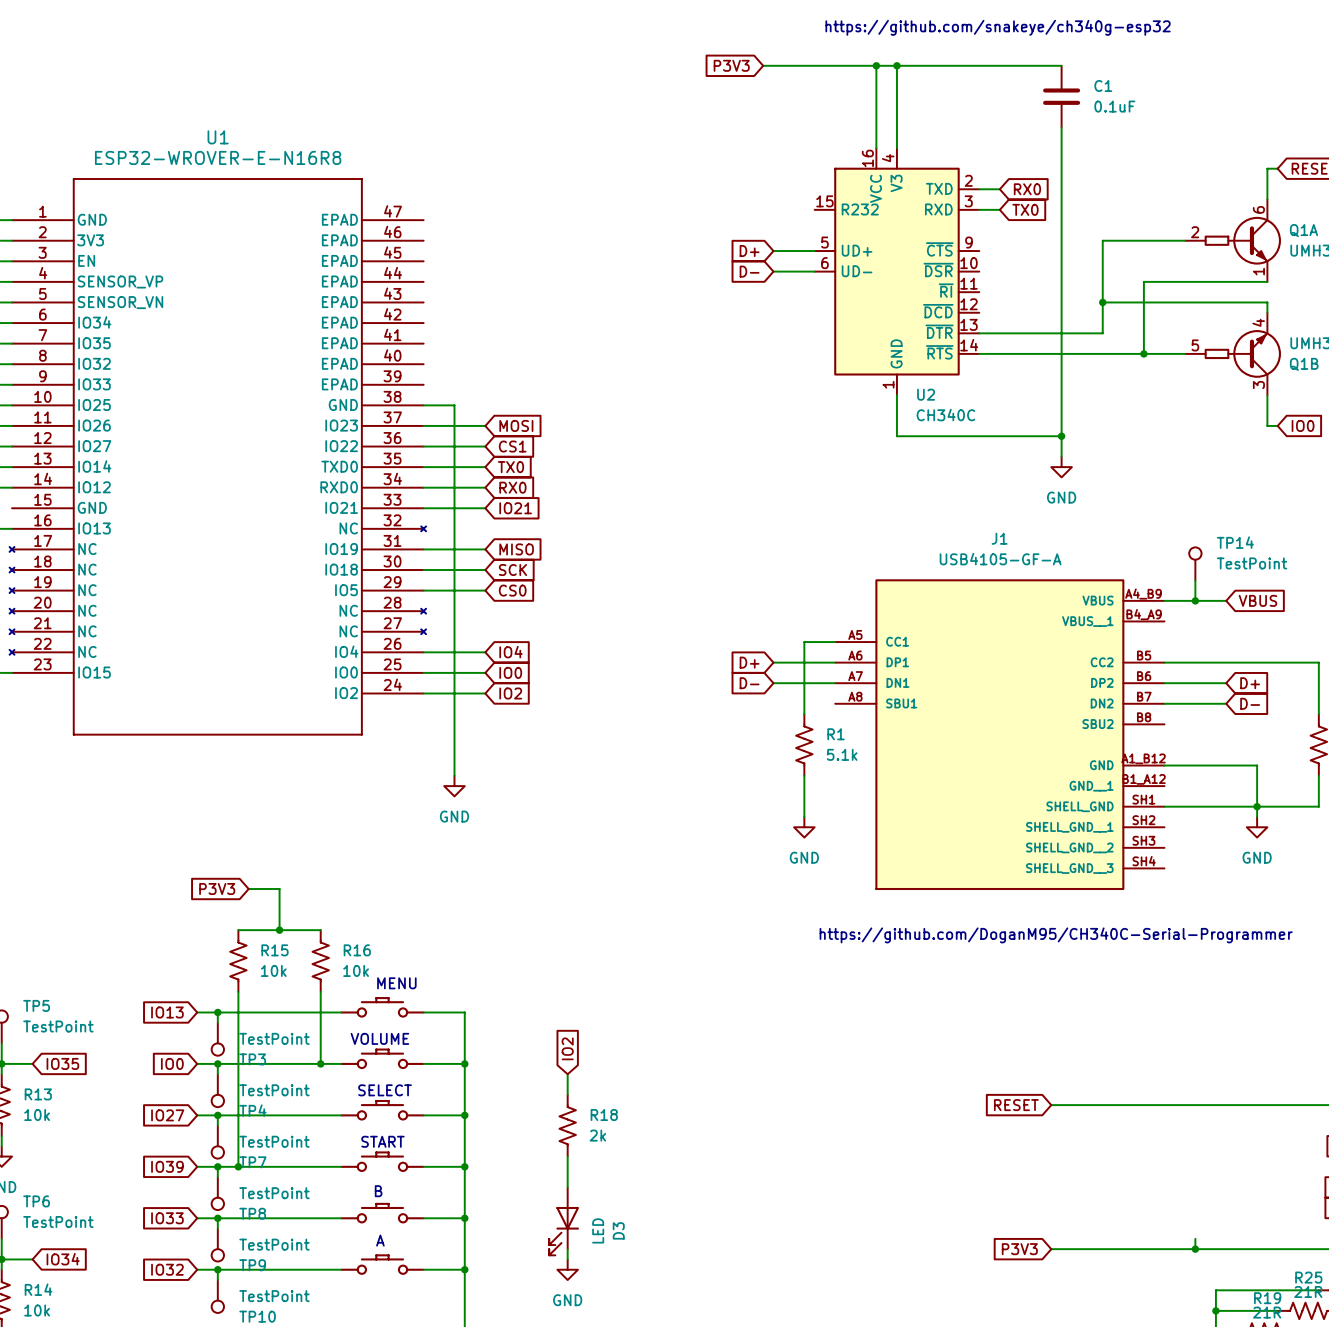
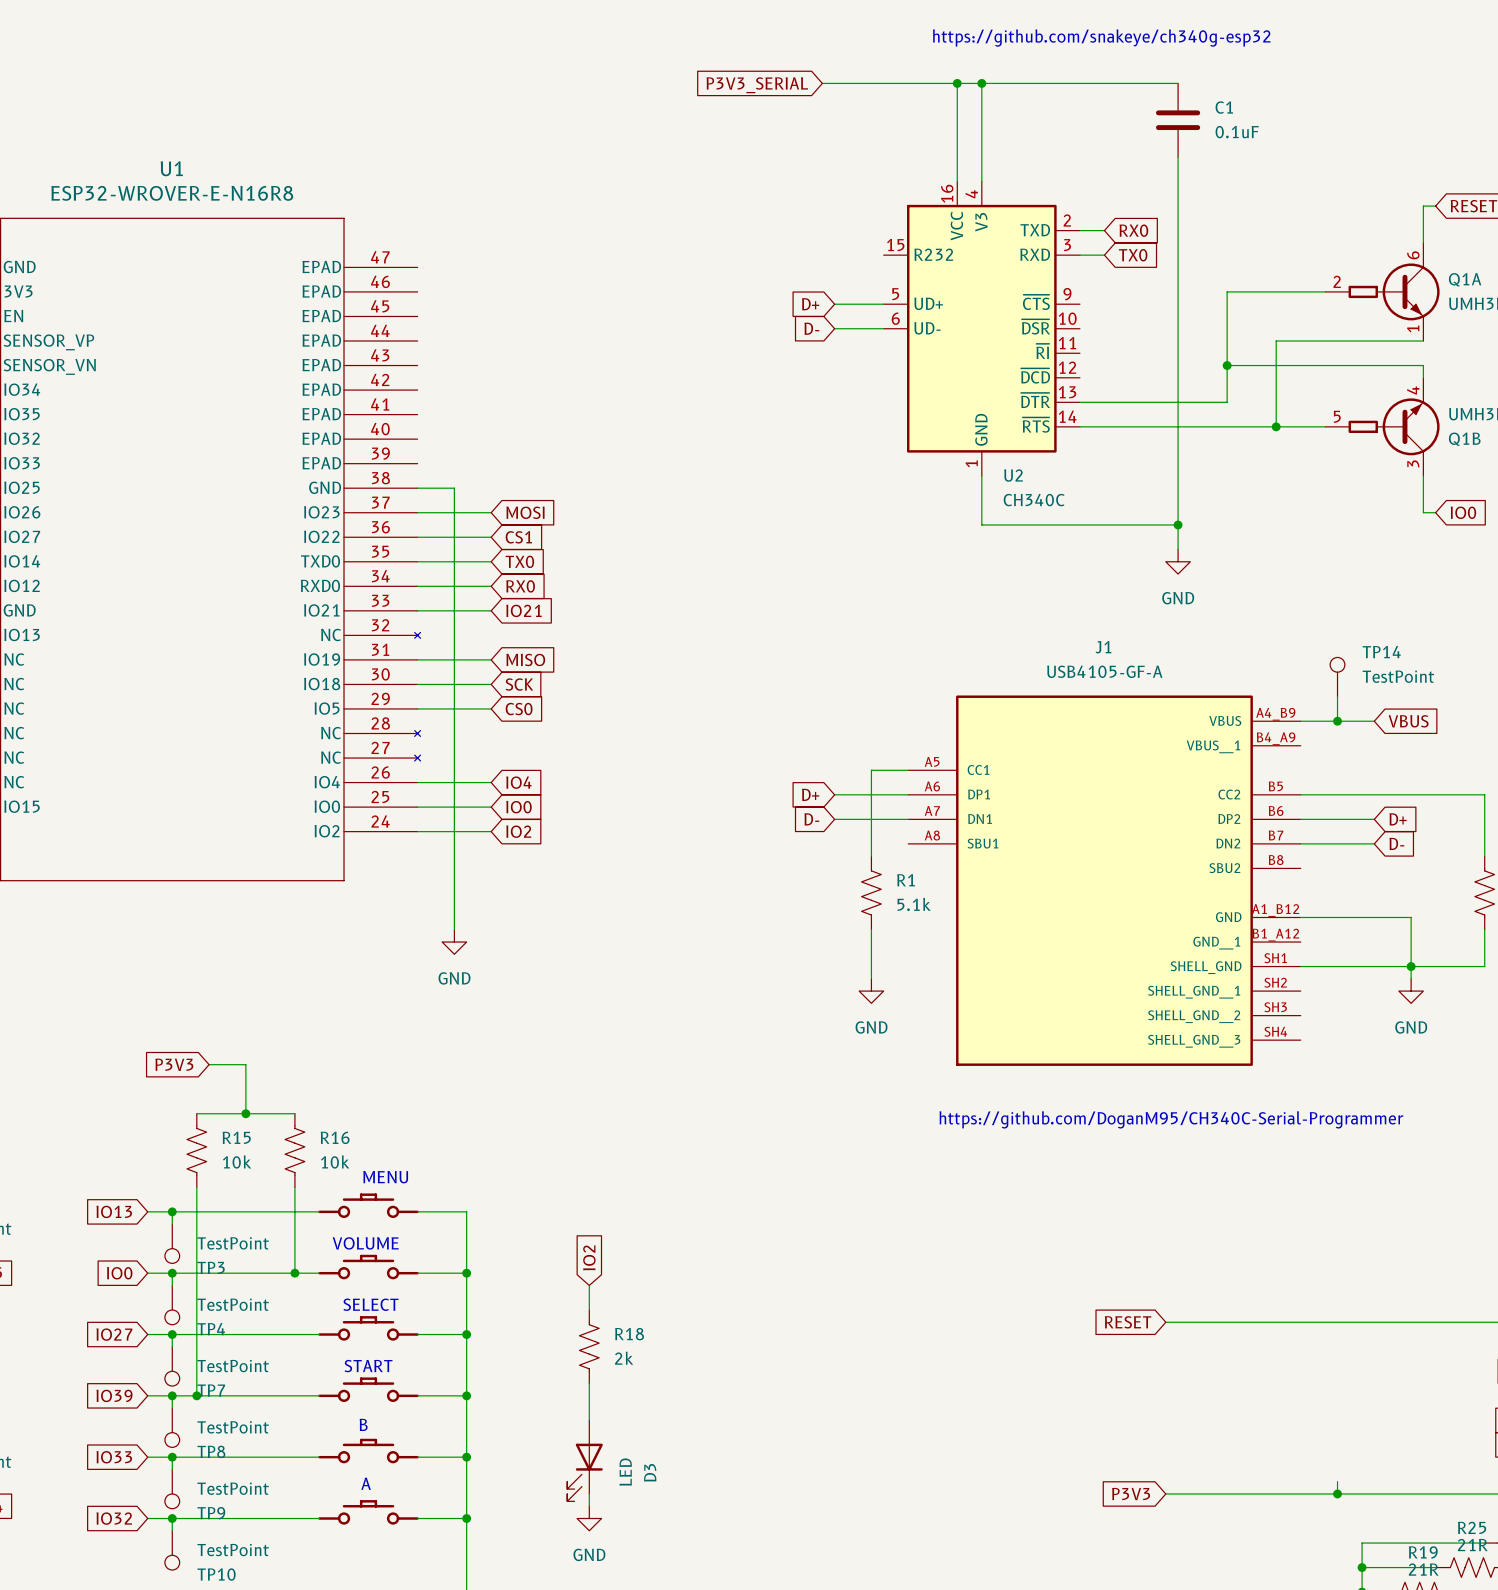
global label: P3V3 (731, 65) -> P3V3_SERIAL (757, 85)

